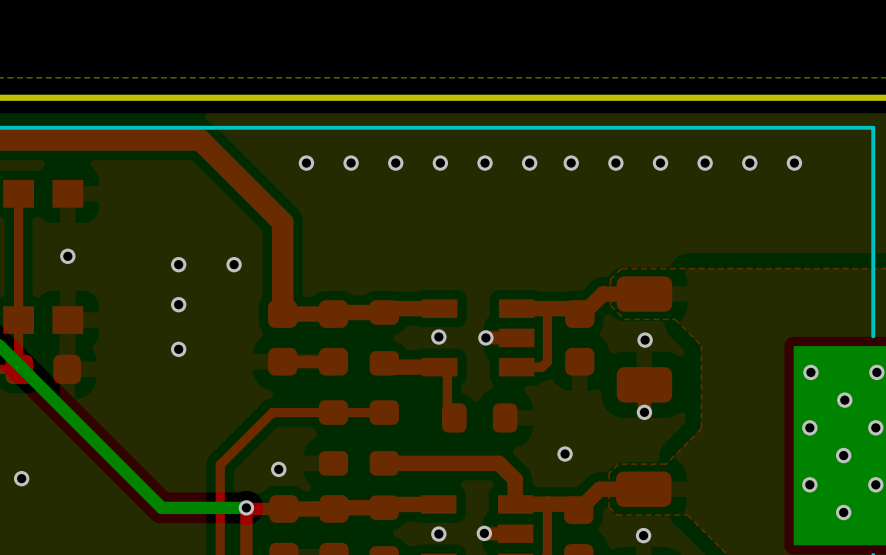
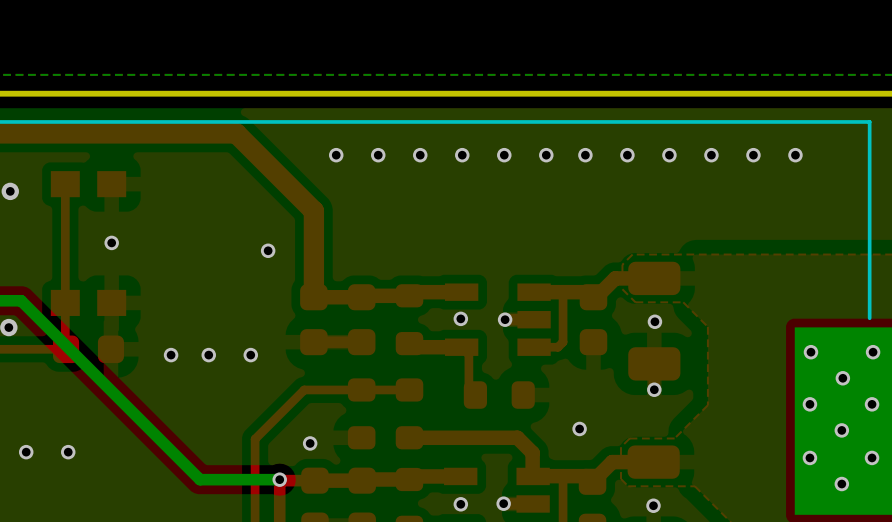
via: (178, 264) -> none
via: (178, 304) -> none
via: (178, 349) -> none
via: none -> (171, 355)
via: none -> (208, 355)
via: none -> (250, 355)

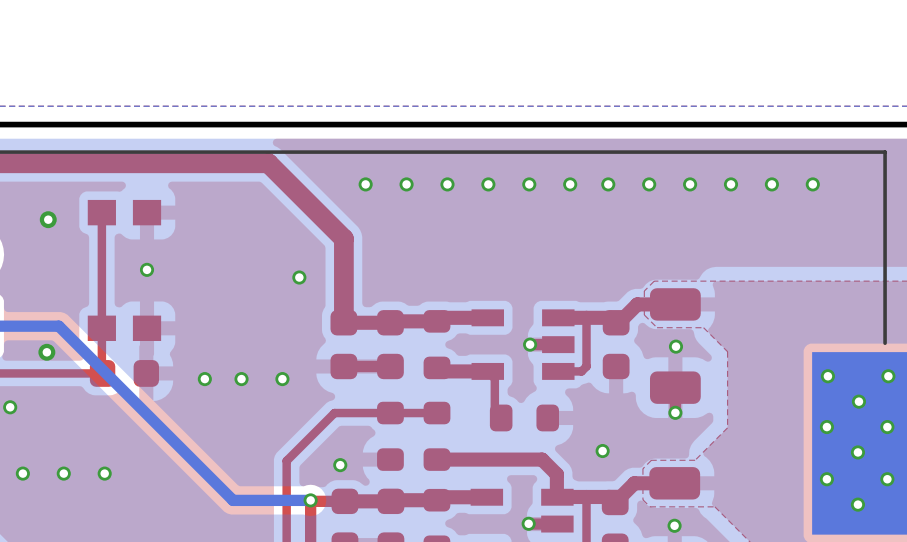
via: (460, 318) -> none
via: (460, 504) -> none

